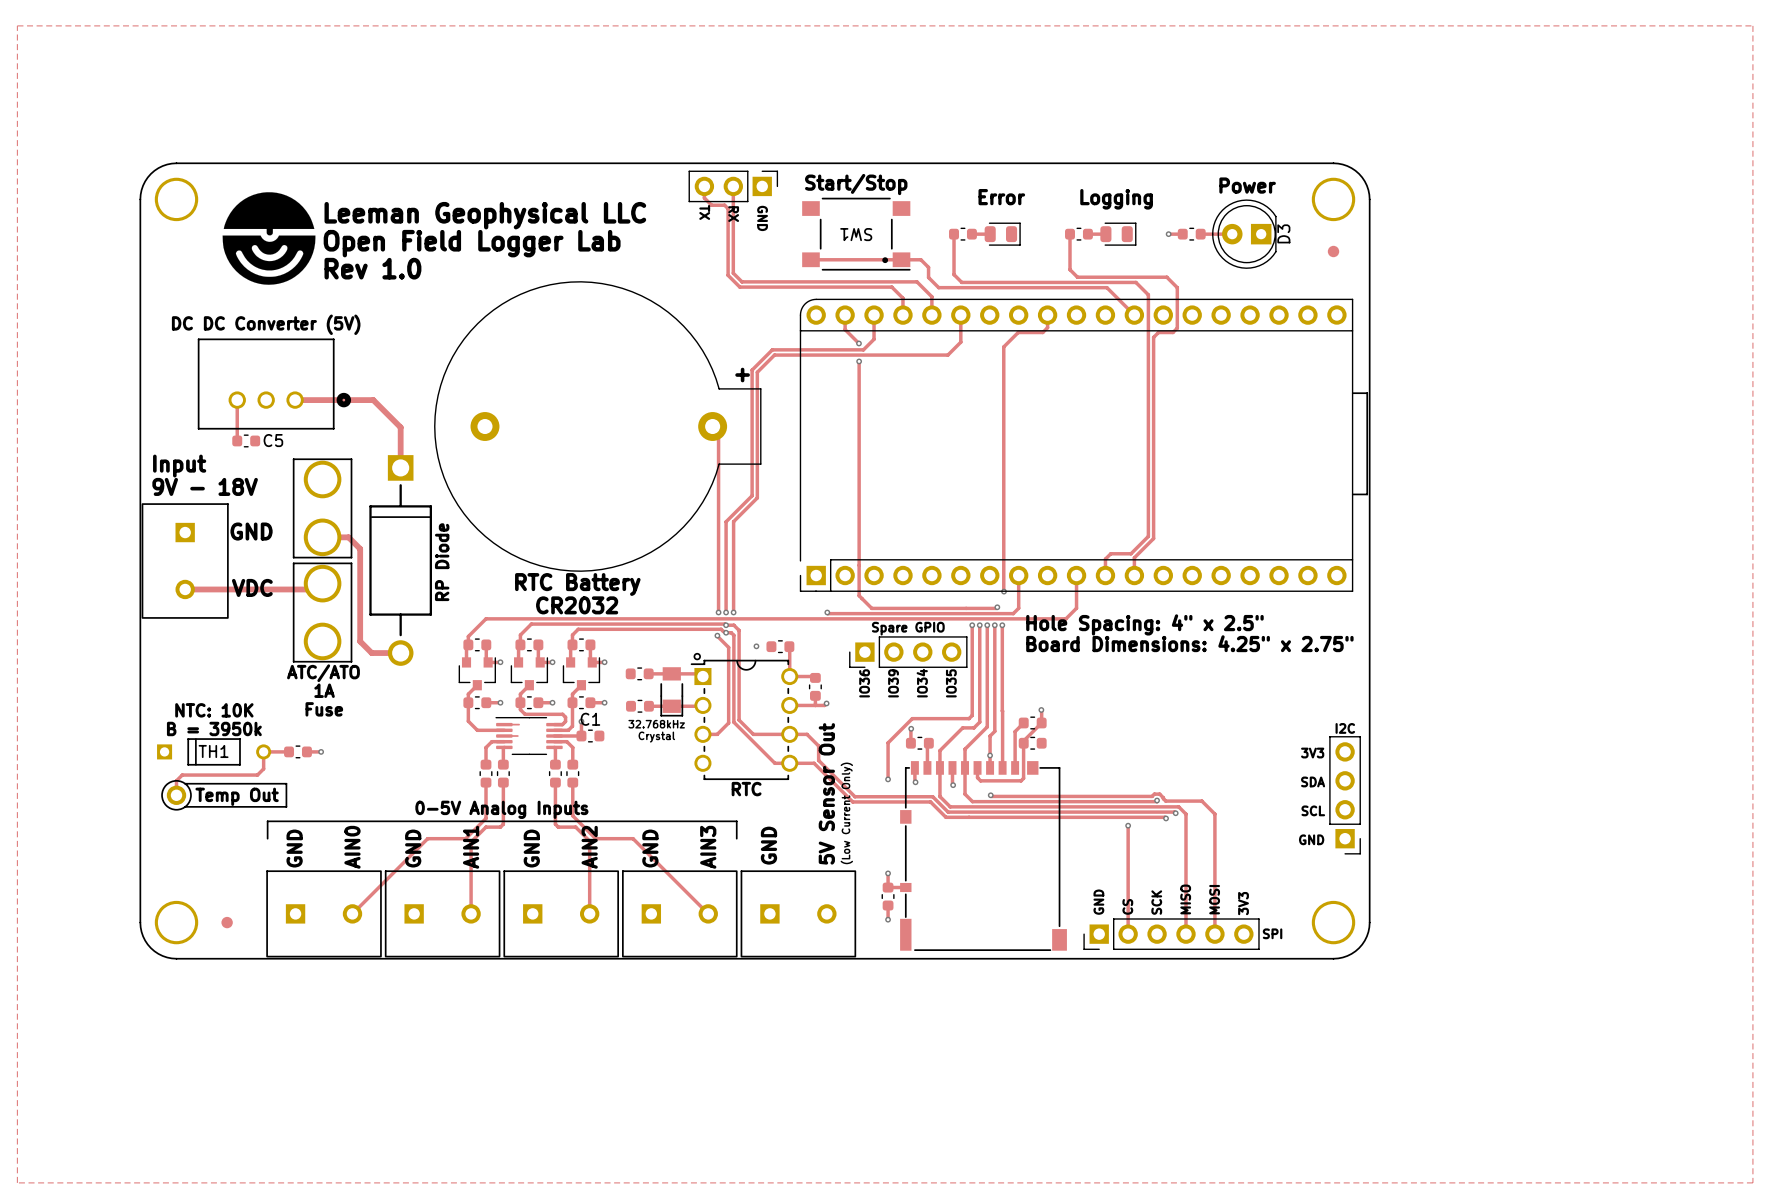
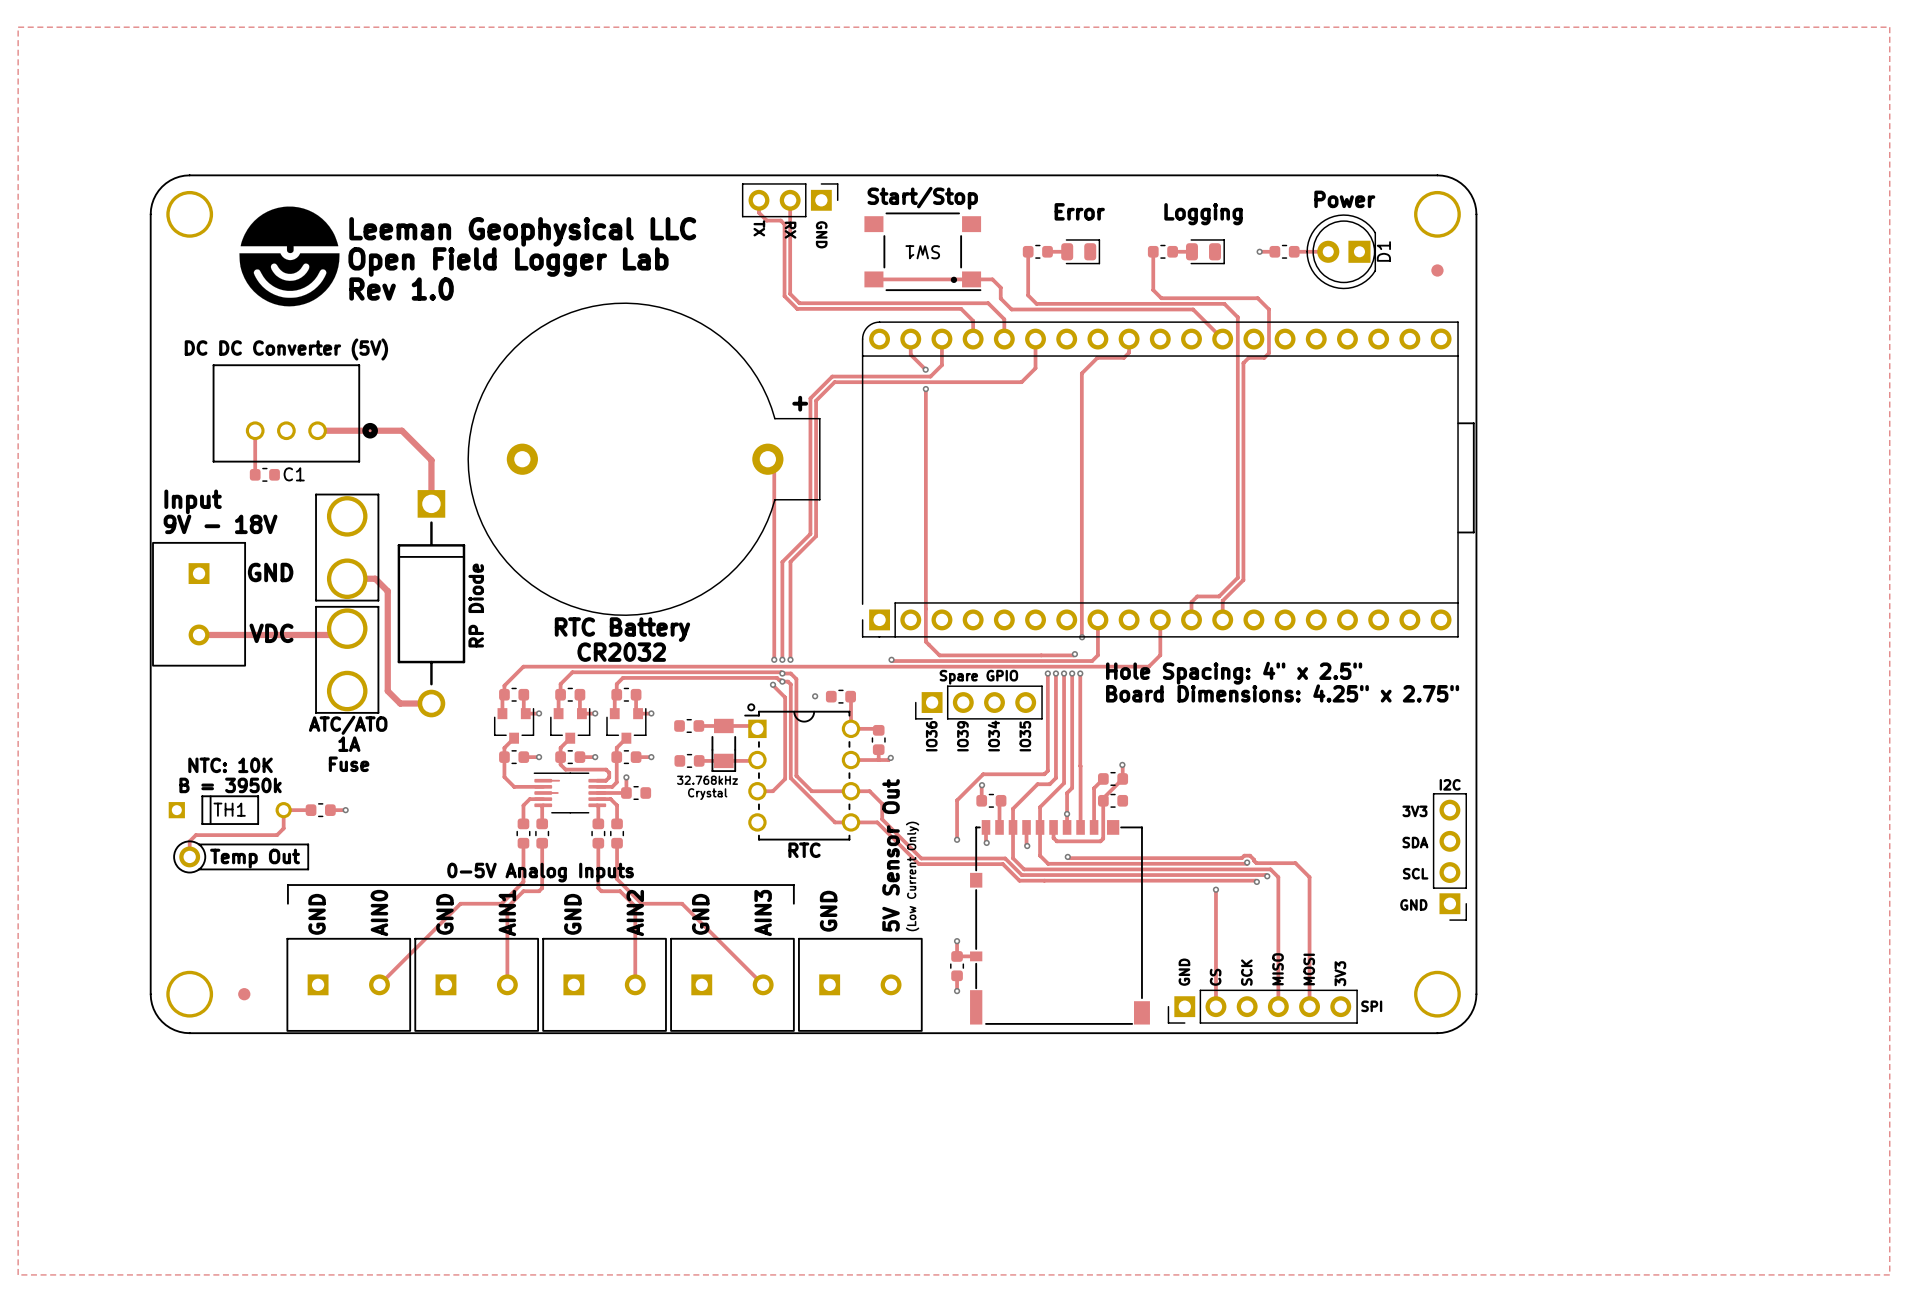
D3 name: D3 (1283, 233) -> D1 (1383, 251)
C5 name: C5 (273, 440) -> C1 (294, 474)
C1 name: C1 (590, 719) -> none

